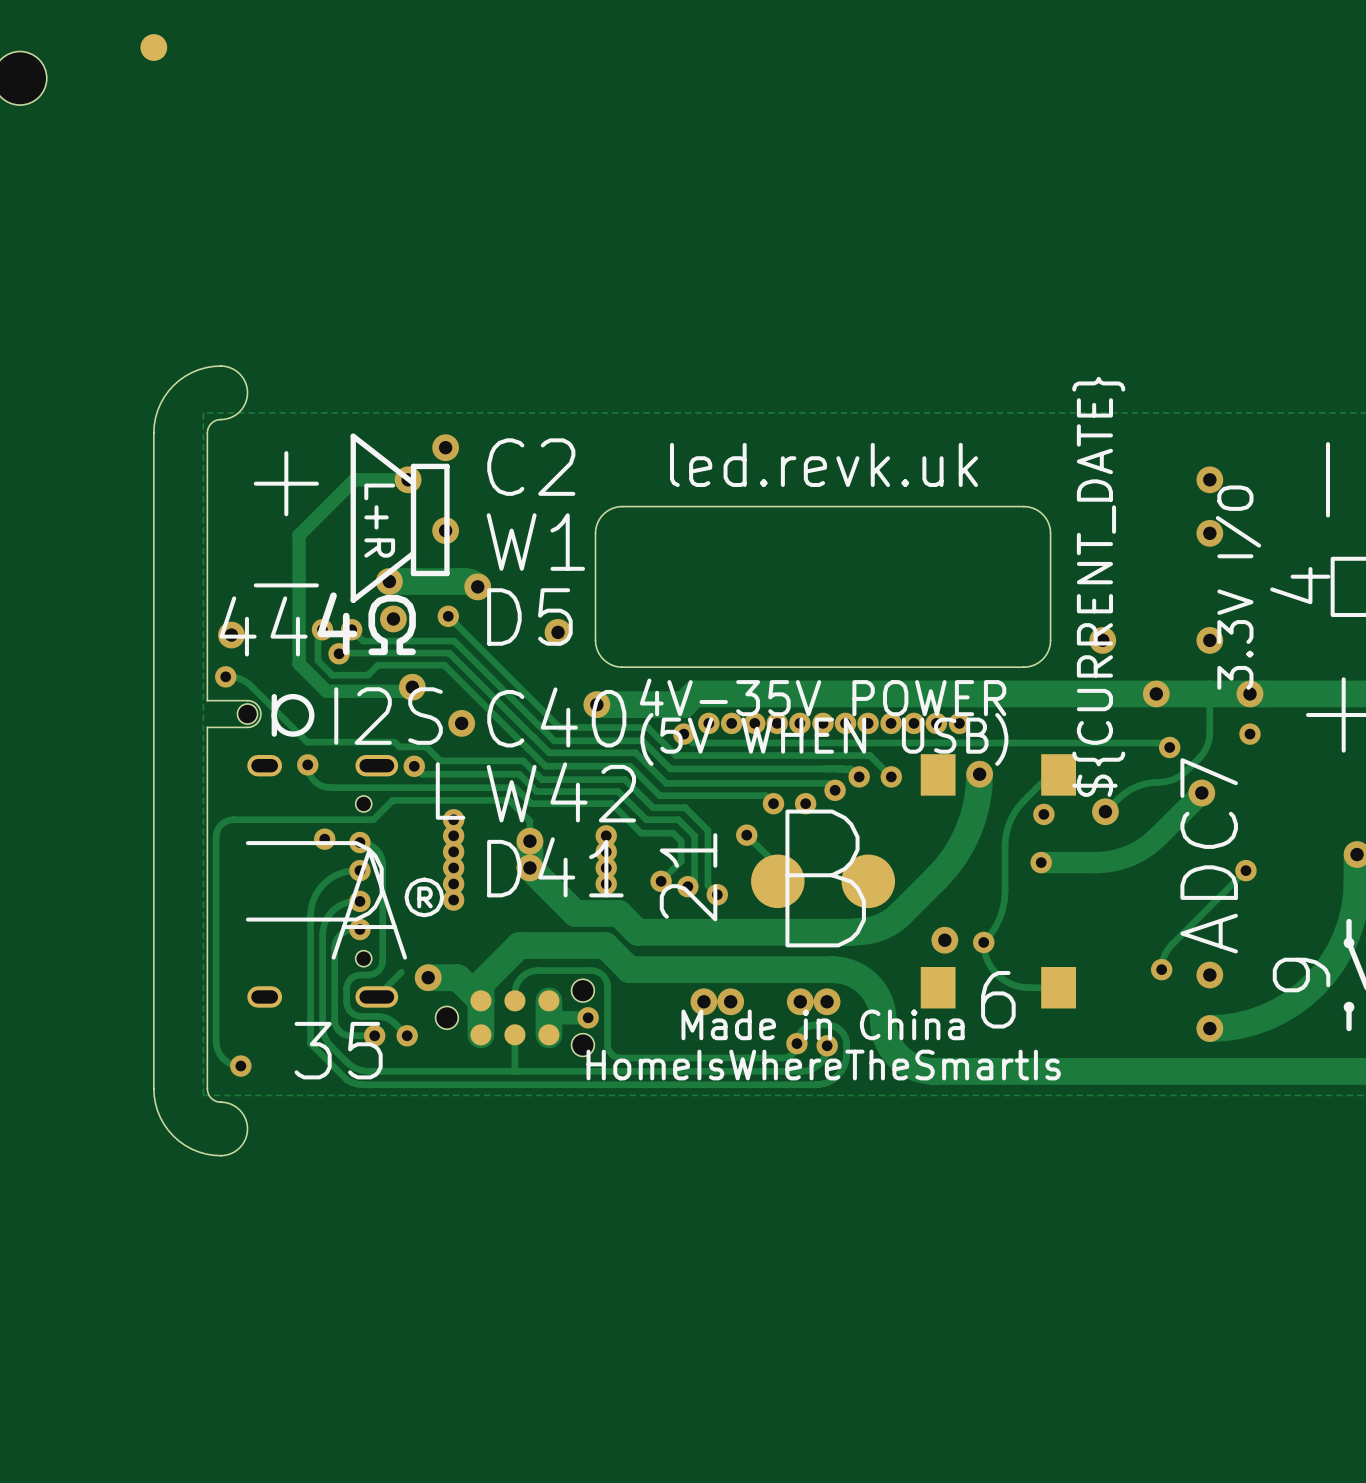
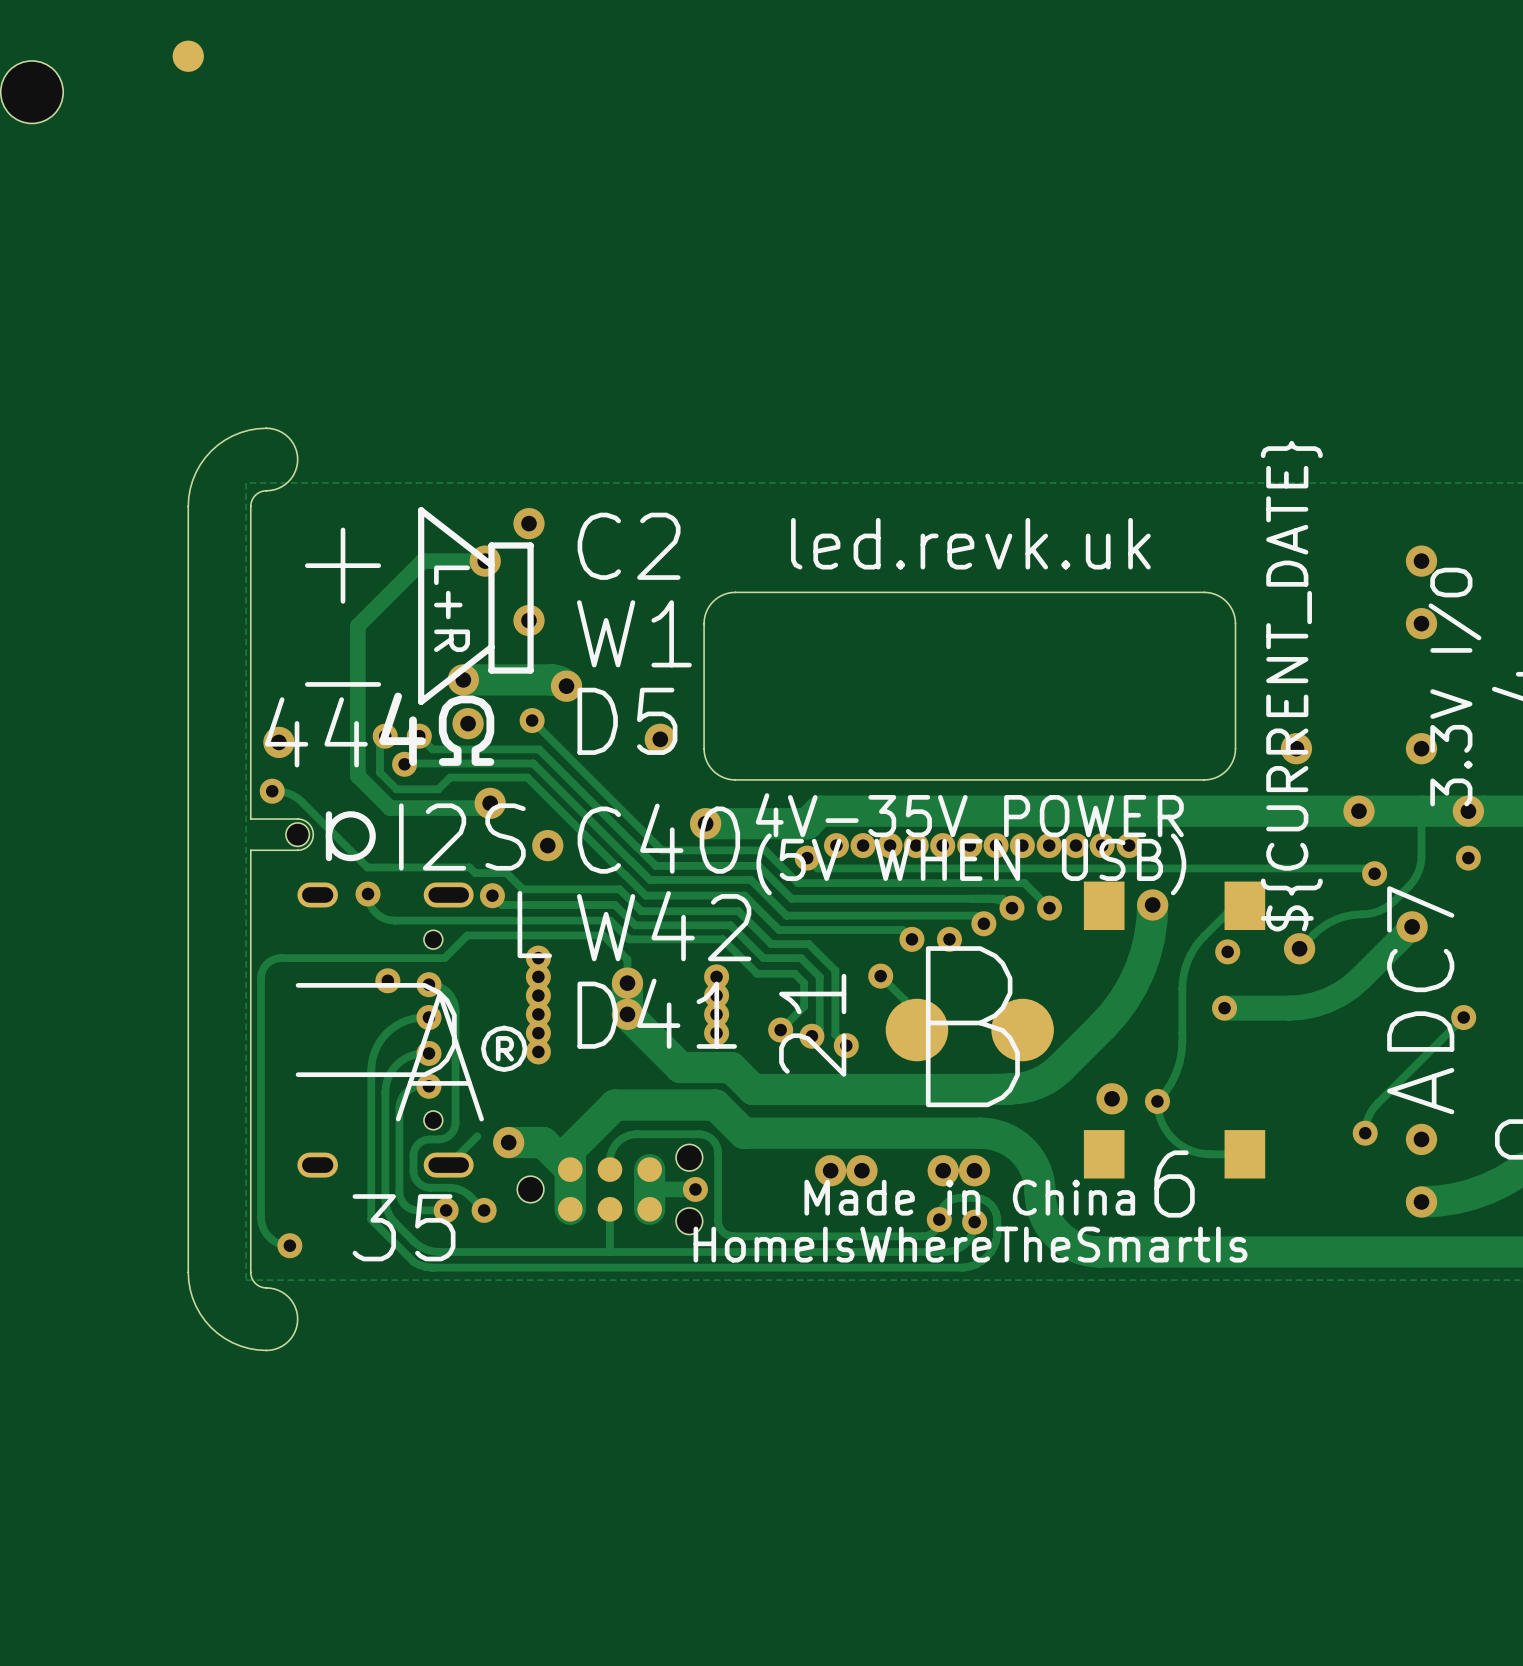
text position: 6 (998, 999) -> 6 (1174, 1184)

